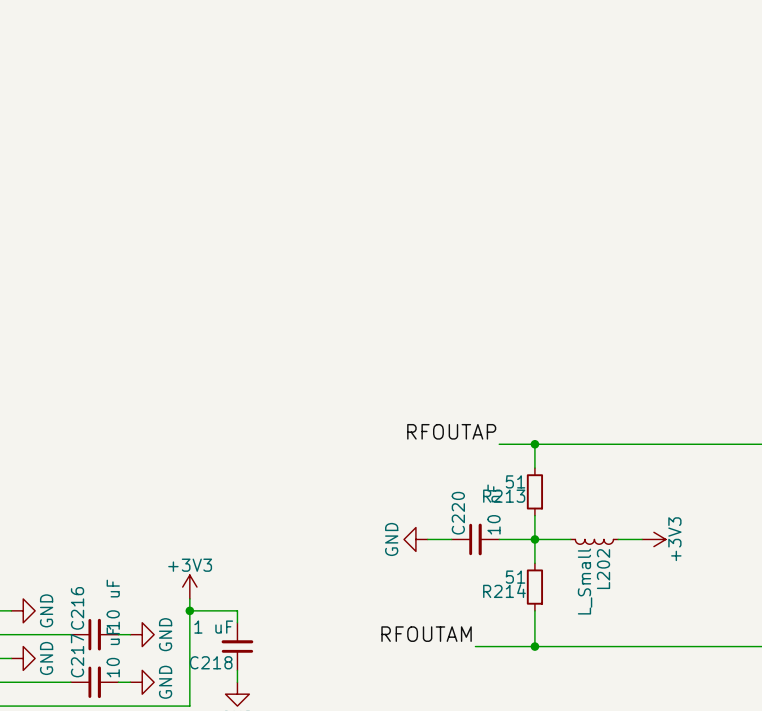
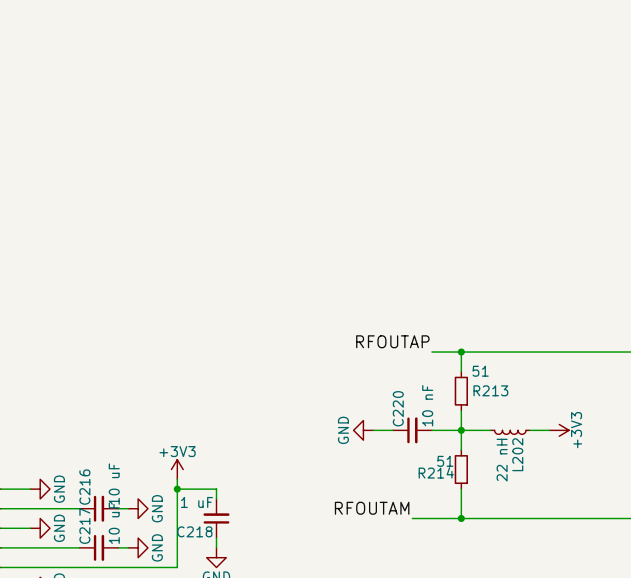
R213 value position: 51 (515, 481) -> 51 (480, 371)
R213 name position: R213 (504, 496) -> R213 (490, 390)
L202 value: L_Small (585, 581) -> 22 nH (502, 460)

